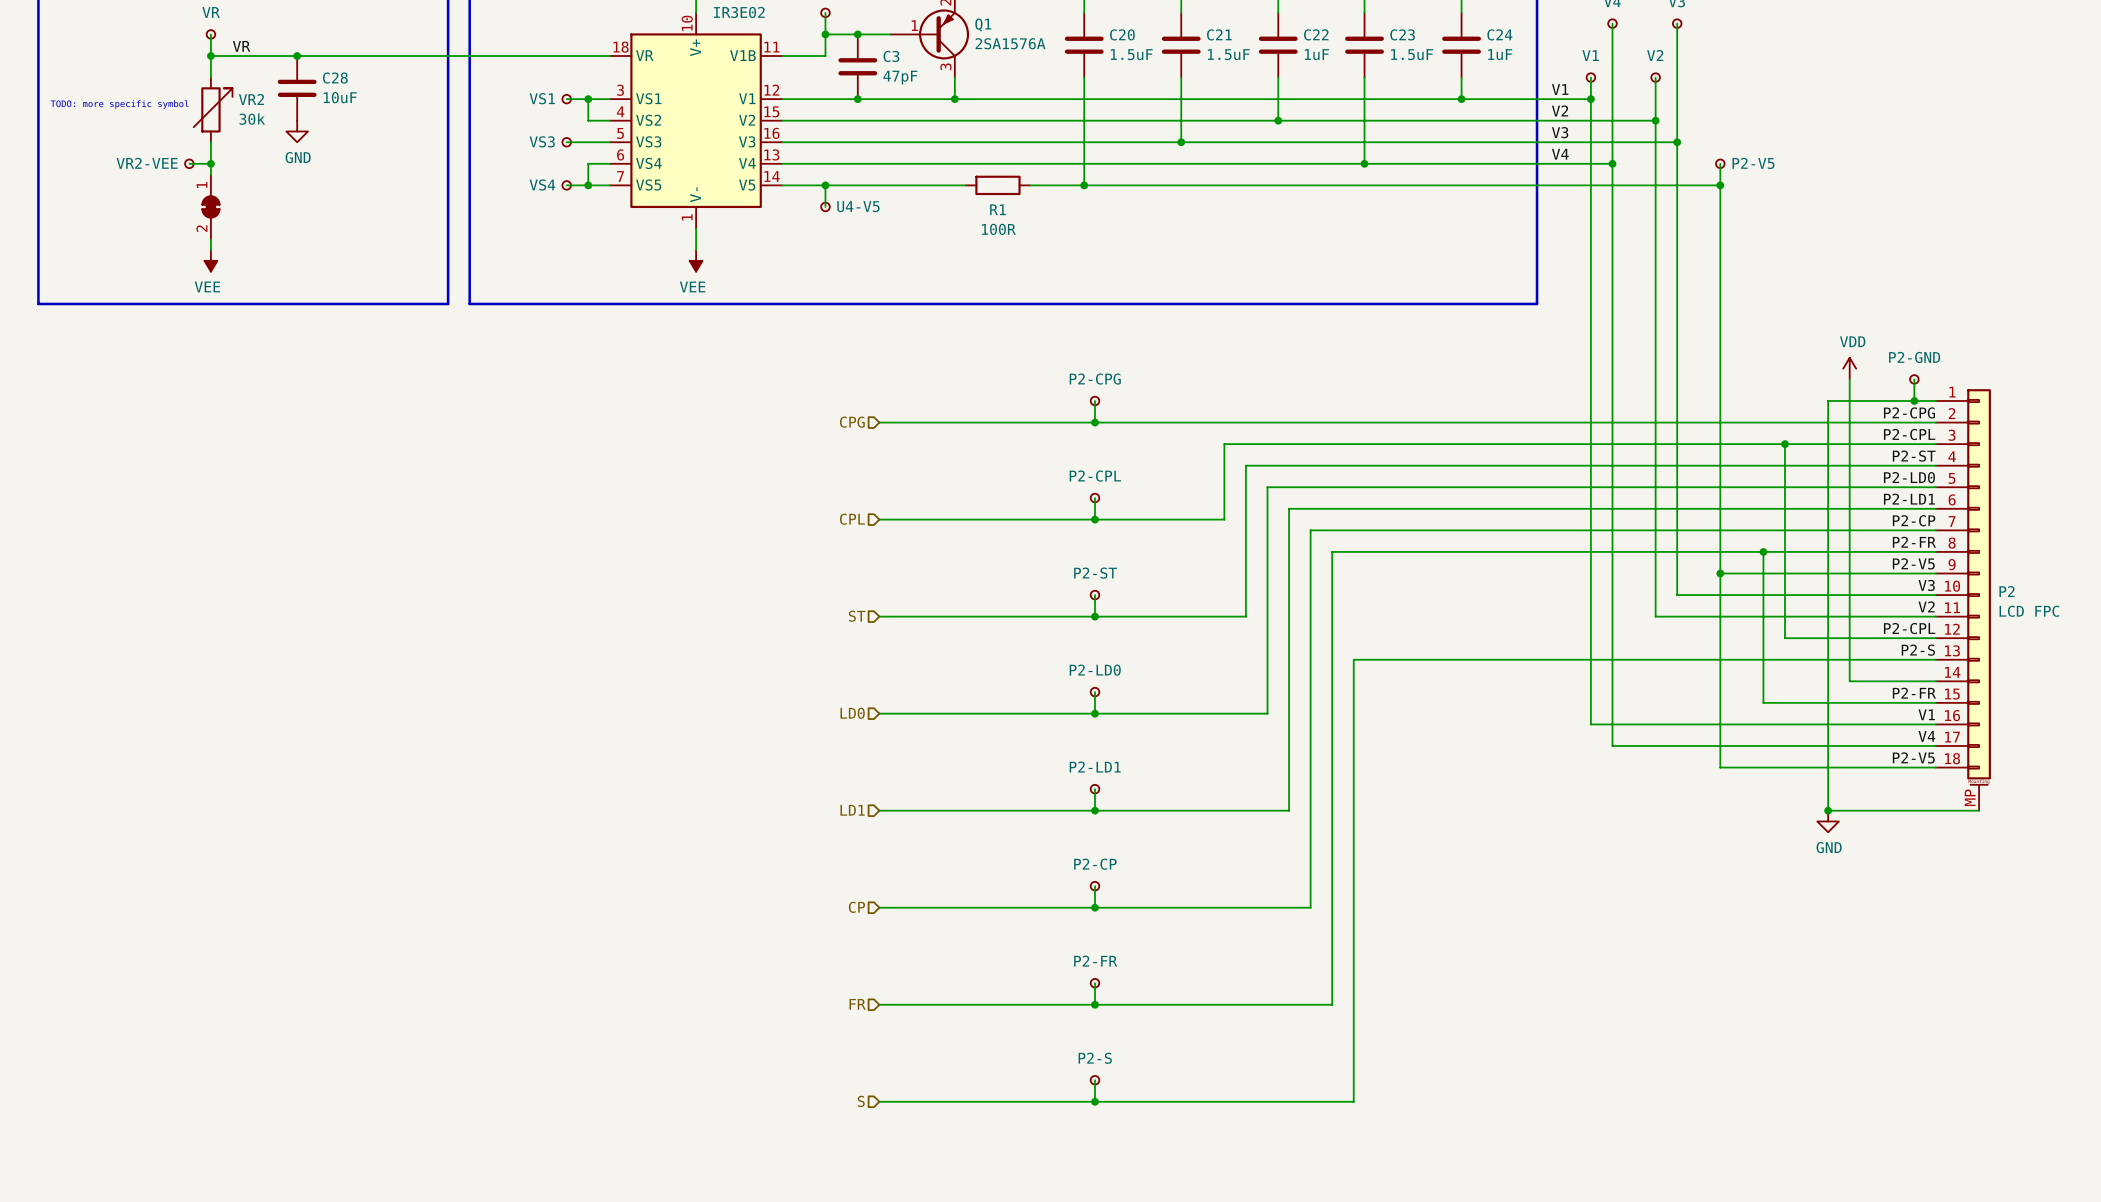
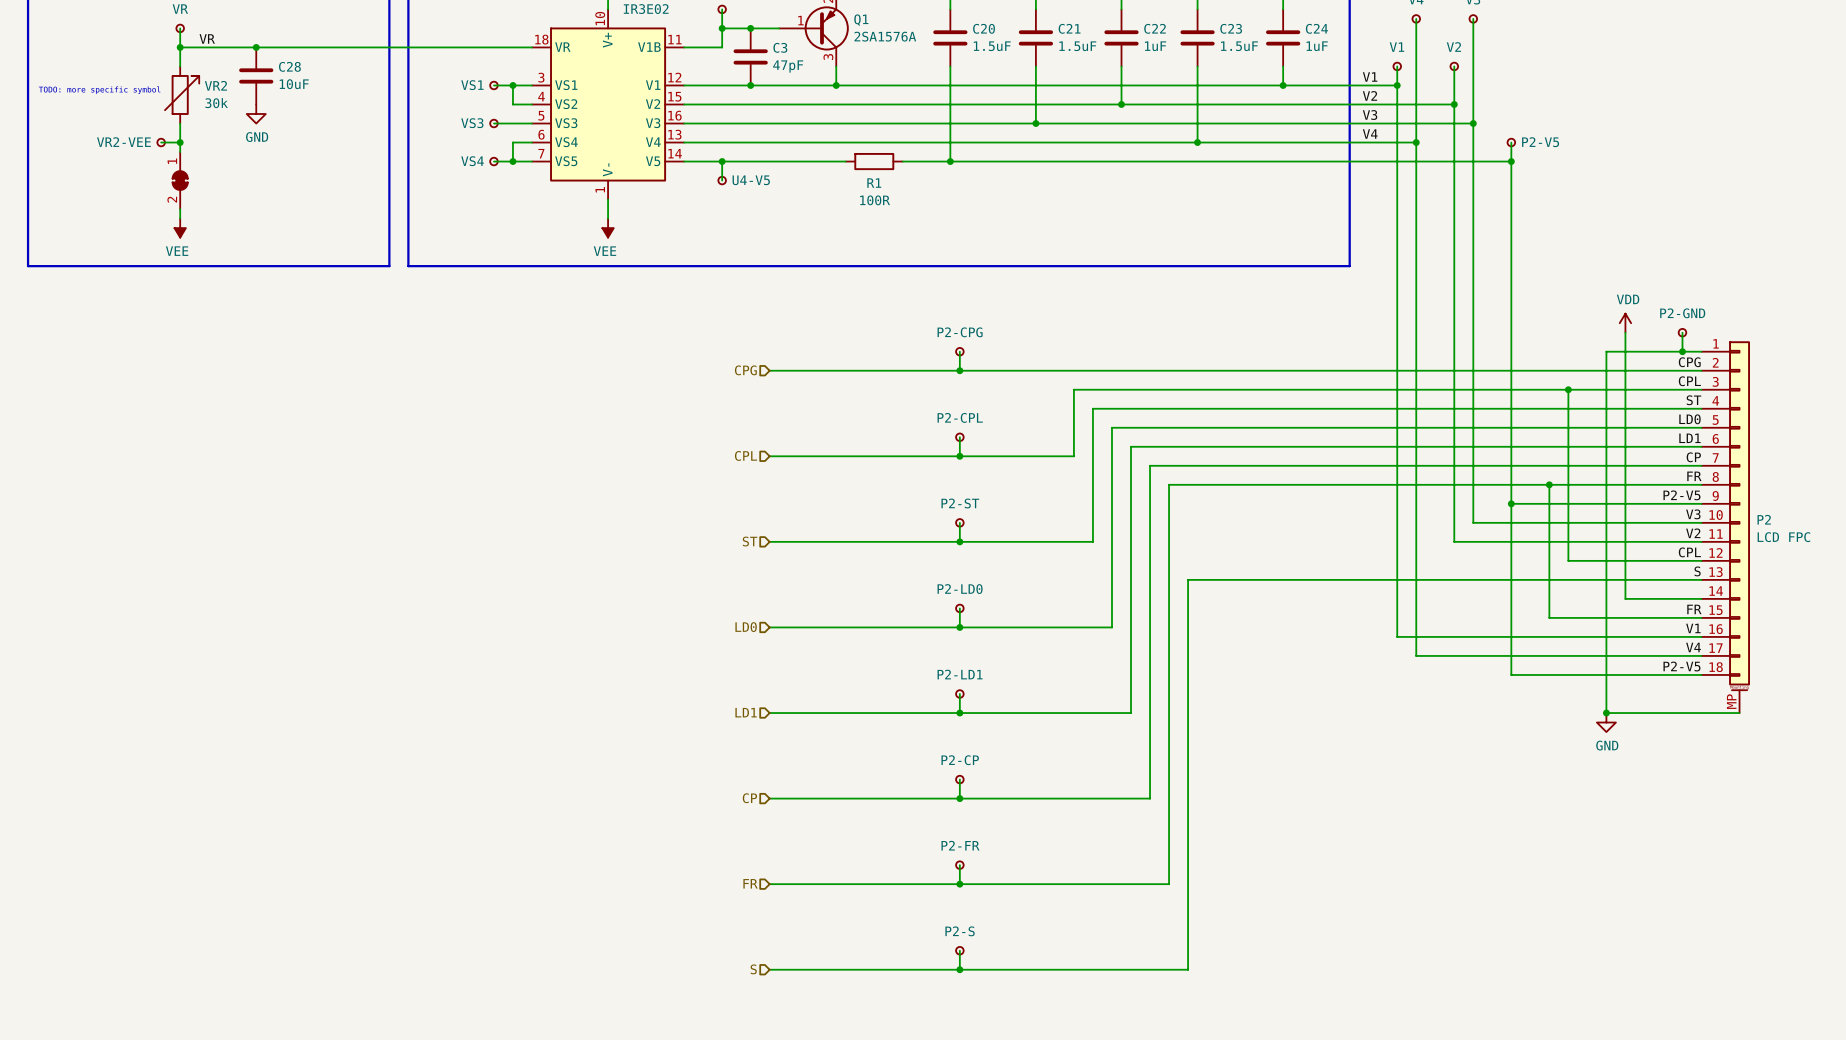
label: P2-CPG (1909, 412) -> CPG (1689, 362)
label: P2-CPL (1909, 434) -> CPL (1689, 381)
label: P2-ST (1914, 456) -> ST (1693, 400)
label: P2-LD0 (1909, 477) -> LD0 (1689, 419)
label: P2-LD1 (1909, 499) -> LD1 (1689, 438)
label: P2-CP (1914, 520) -> CP (1693, 457)
label: P2-FR (1914, 542) -> FR (1694, 476)
label: P2-CPL (1909, 628) -> CPL (1689, 552)
label: P2-S (1918, 650) -> S (1697, 571)
label: P2-FR (1914, 693) -> FR (1694, 609)

